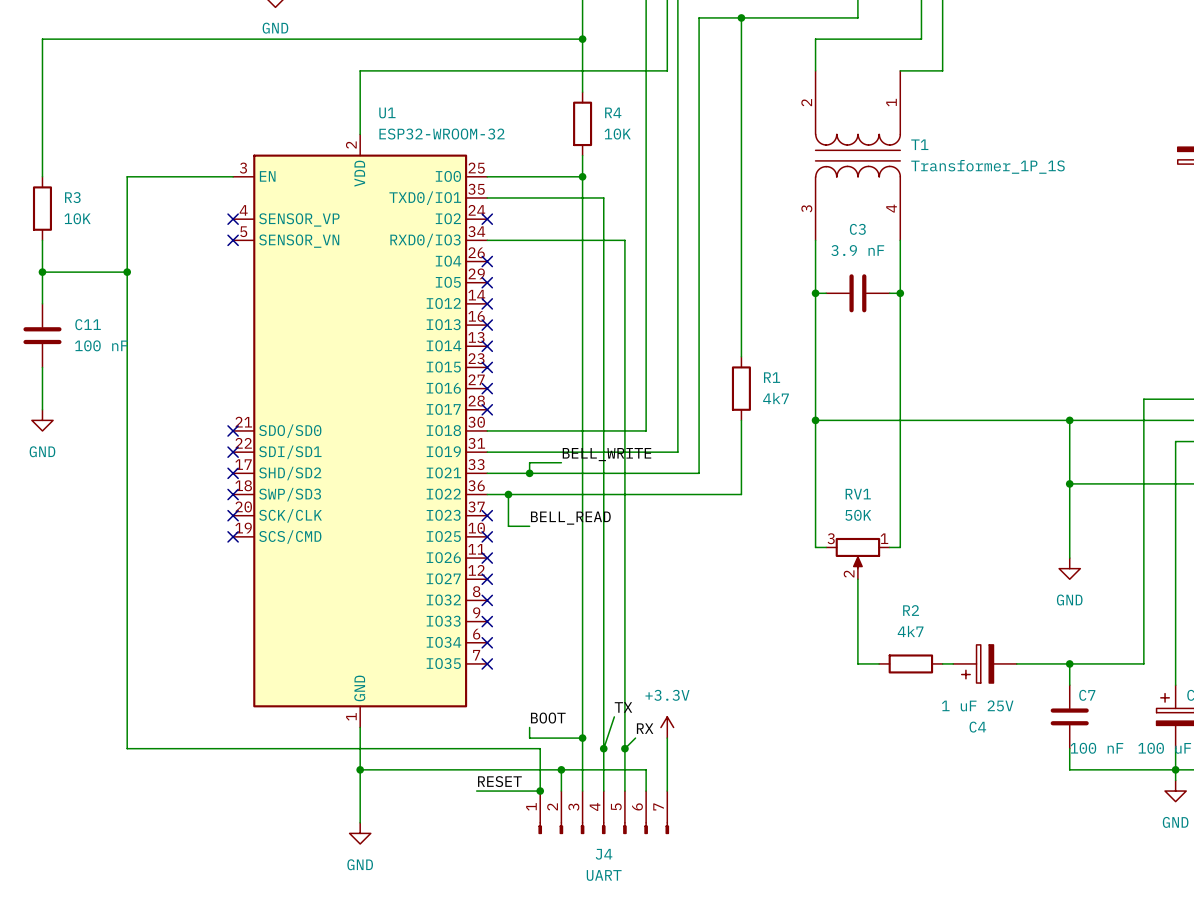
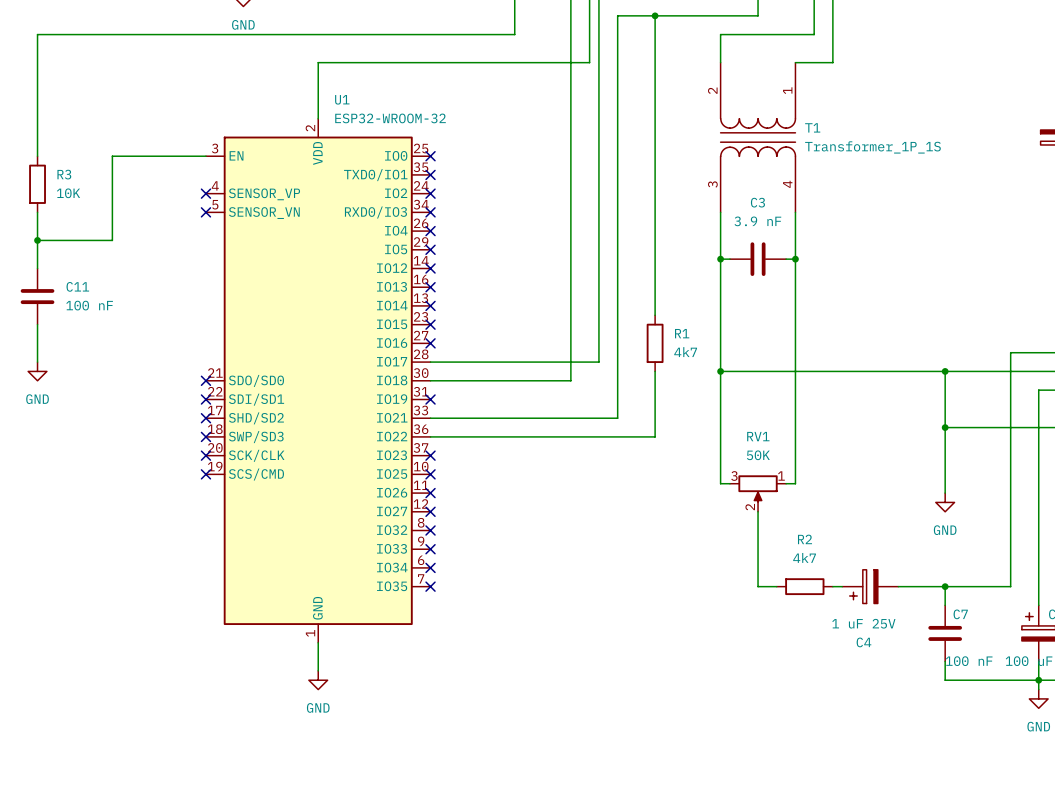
wire: (582, 39) (582, 92) -> none
junction: (582, 39) -> none
R4: 10K (582, 123) -> none
wire: (582, 155) (582, 791) -> none
wire: (487, 176) (582, 176) -> none
no-connect mark: none -> (430, 156)
junction: (582, 176) -> none
wire: (487, 197) (603, 197) (603, 791) -> none
no-connect mark: none -> (430, 174)
wire: (487, 240) (624, 240) (624, 791) -> none
no-connect mark: none -> (430, 212)
wire: (127, 272) (127, 748) (540, 748) (540, 791) (476, 791) -> none
junction: (127, 272) -> none
no-connect mark position: (487, 409) -> (430, 399)
wire: (677, 409) (677, 452) (487, 452) -> (598, 362) (430, 362)
label: BELL_WRITE (606, 454) -> none
wire: (561, 462) (529, 462) (529, 473) -> none
junction: (529, 473) -> none
wire: (508, 494) (508, 526) (529, 526) -> none
junction: (508, 494) -> none
label: BELL_READ (570, 518) -> none
label: TX (623, 707) -> none
wire: (614, 716) (603, 748) -> none
label: BOOT (548, 718) -> none
wire: (529, 727) (529, 738) (582, 738) -> none
power symbol: +3.3V (667, 727) -> none
label: RX (645, 728) -> none
junction: (582, 738) -> none
wire: (635, 738) (624, 748) -> none
wire: (667, 738) (667, 791) -> none
junction: (603, 748) -> none
junction: (624, 748) -> none
wire: (360, 759) (360, 822) -> none
wire: (360, 769) (646, 769) (646, 791) -> none
junction: (360, 769) -> none
wire: (561, 769) (561, 791) -> none
junction: (561, 769) -> none
label: RESET (499, 781) -> none
junction: (540, 791) -> none
J4: UART (603, 812) -> none
power symbol position: GND (360, 833) -> GND (318, 680)

